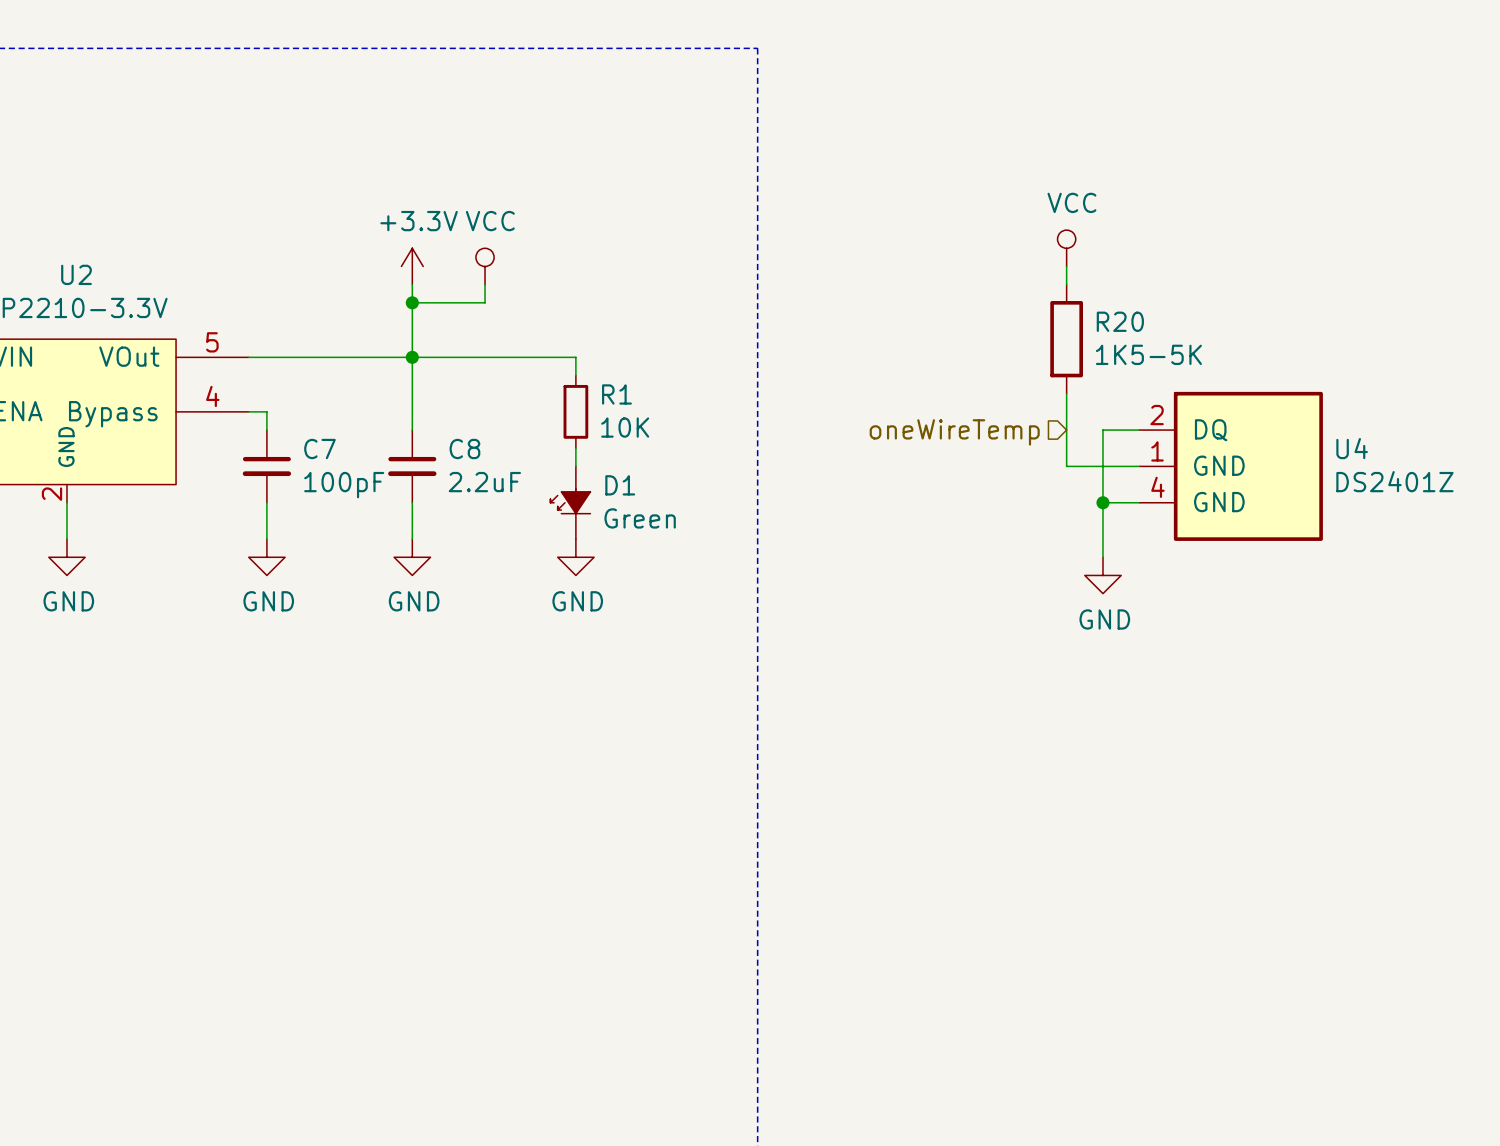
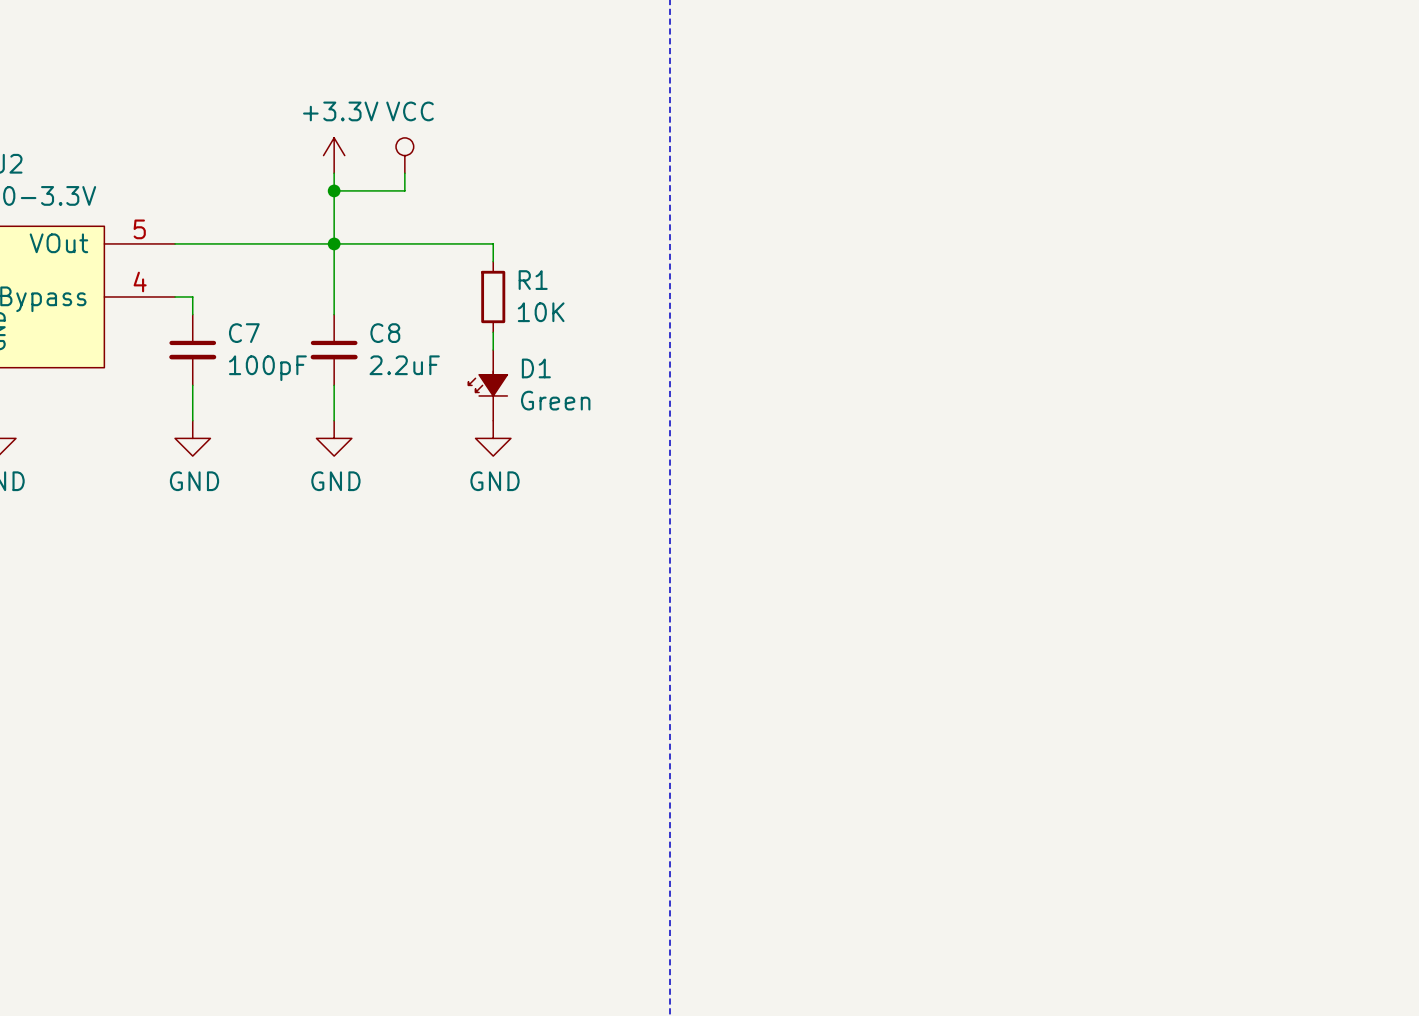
power symbol: VCC (1066, 248) -> none
wire: (1066, 266) (1066, 284) -> none
R20: 1K5-5K (1066, 339) -> none
wire: (1066, 393) (1066, 466) (1139, 466) -> none
wire: (1139, 430) (1102, 430) (1102, 557) -> none
hierarchical label: oneWireTemp (954, 432) -> none
U4: DS2401Z (1231, 466) -> none
wire: (1102, 502) (1139, 502) -> none
junction: (1102, 502) -> none
power symbol: GND (1102, 575) -> none

